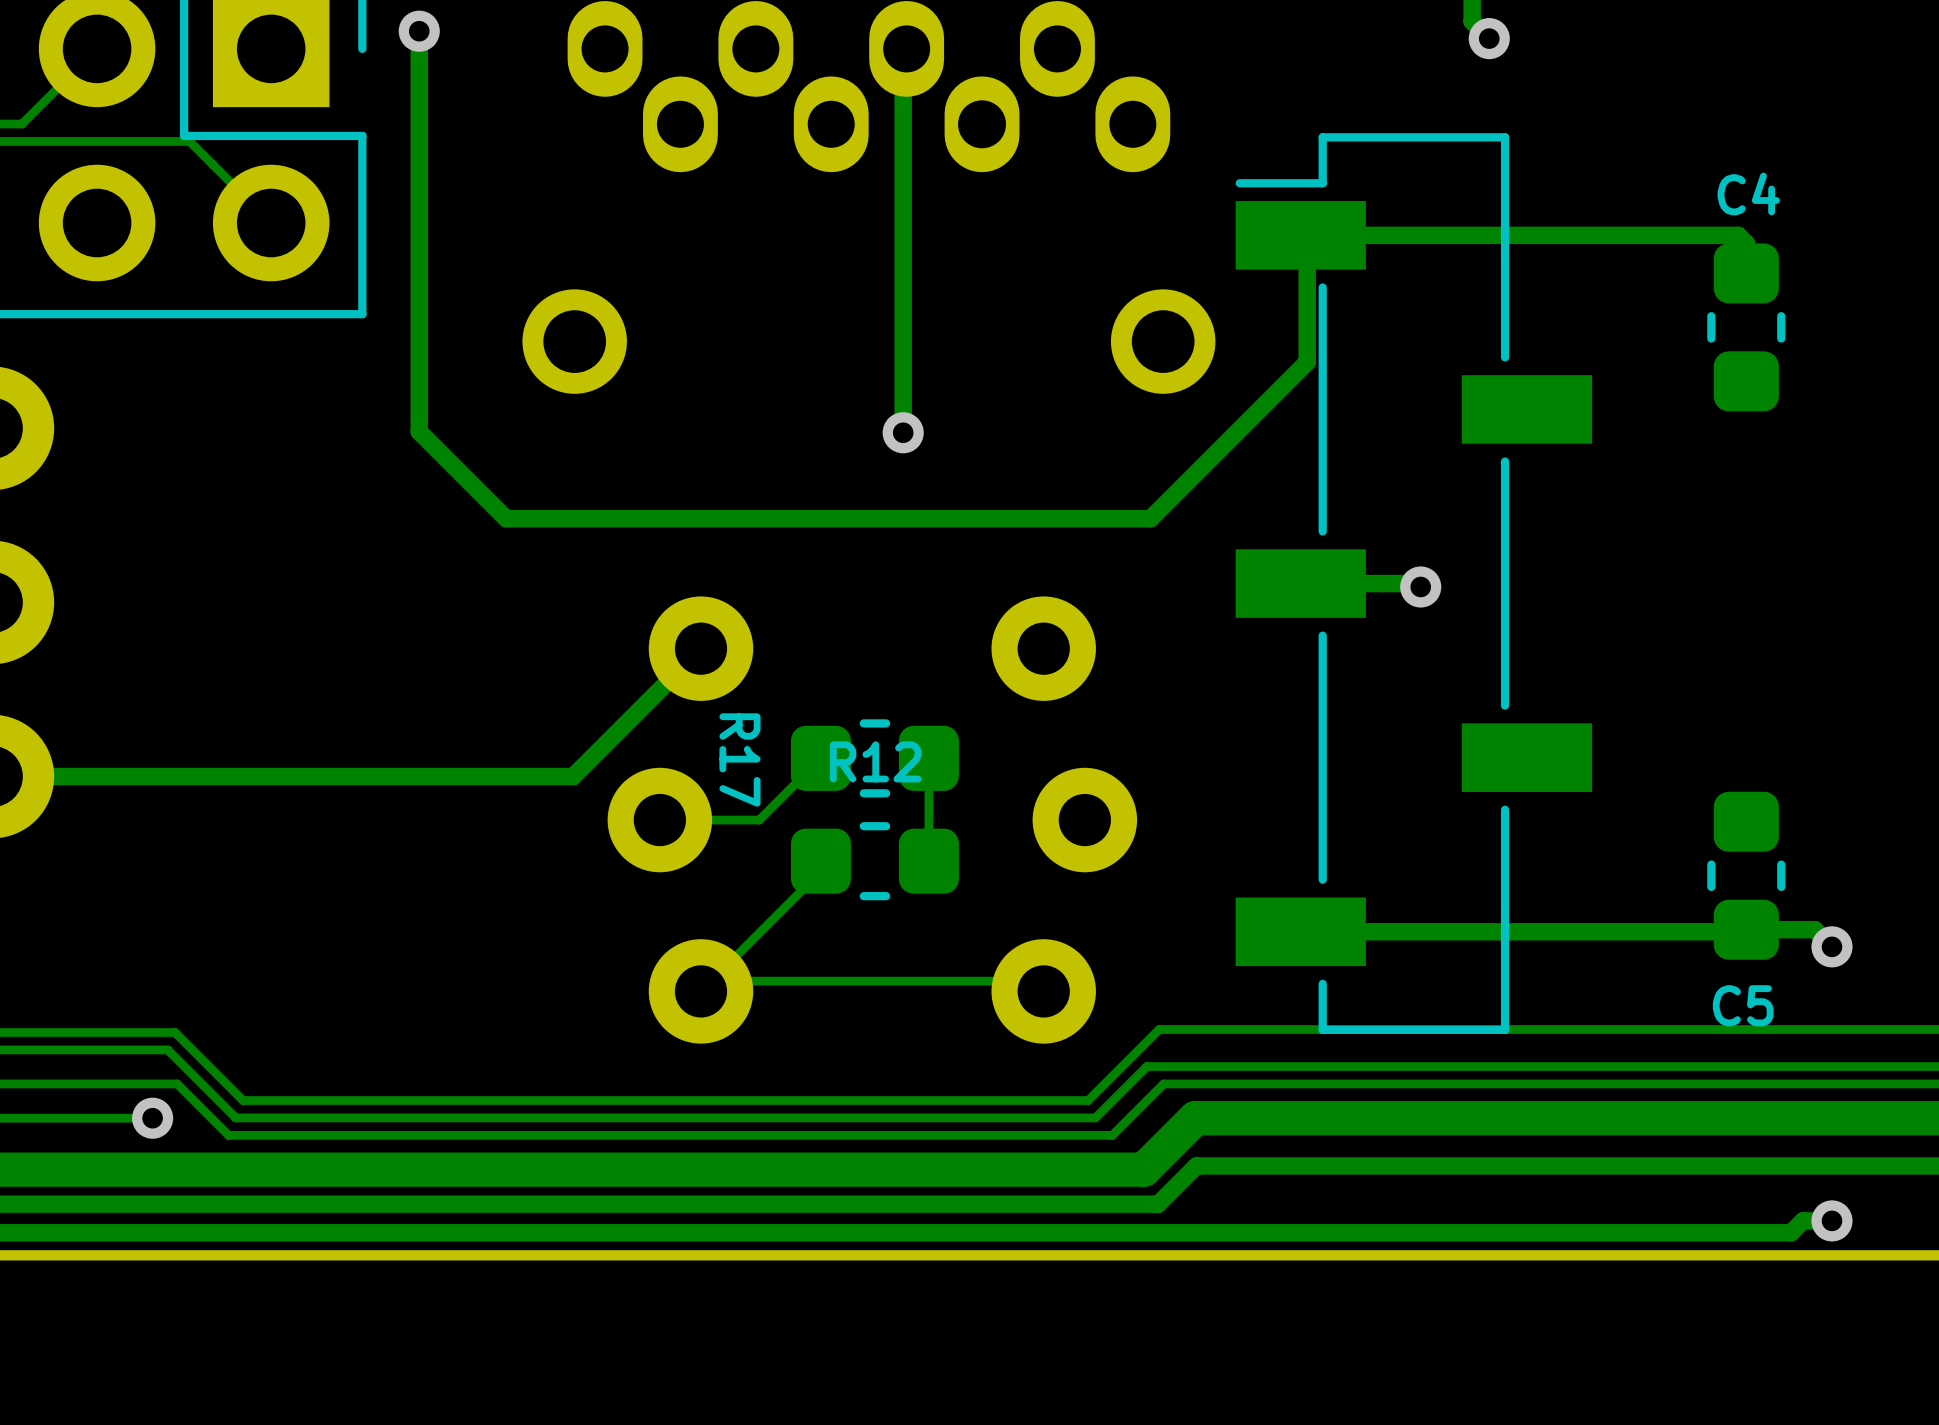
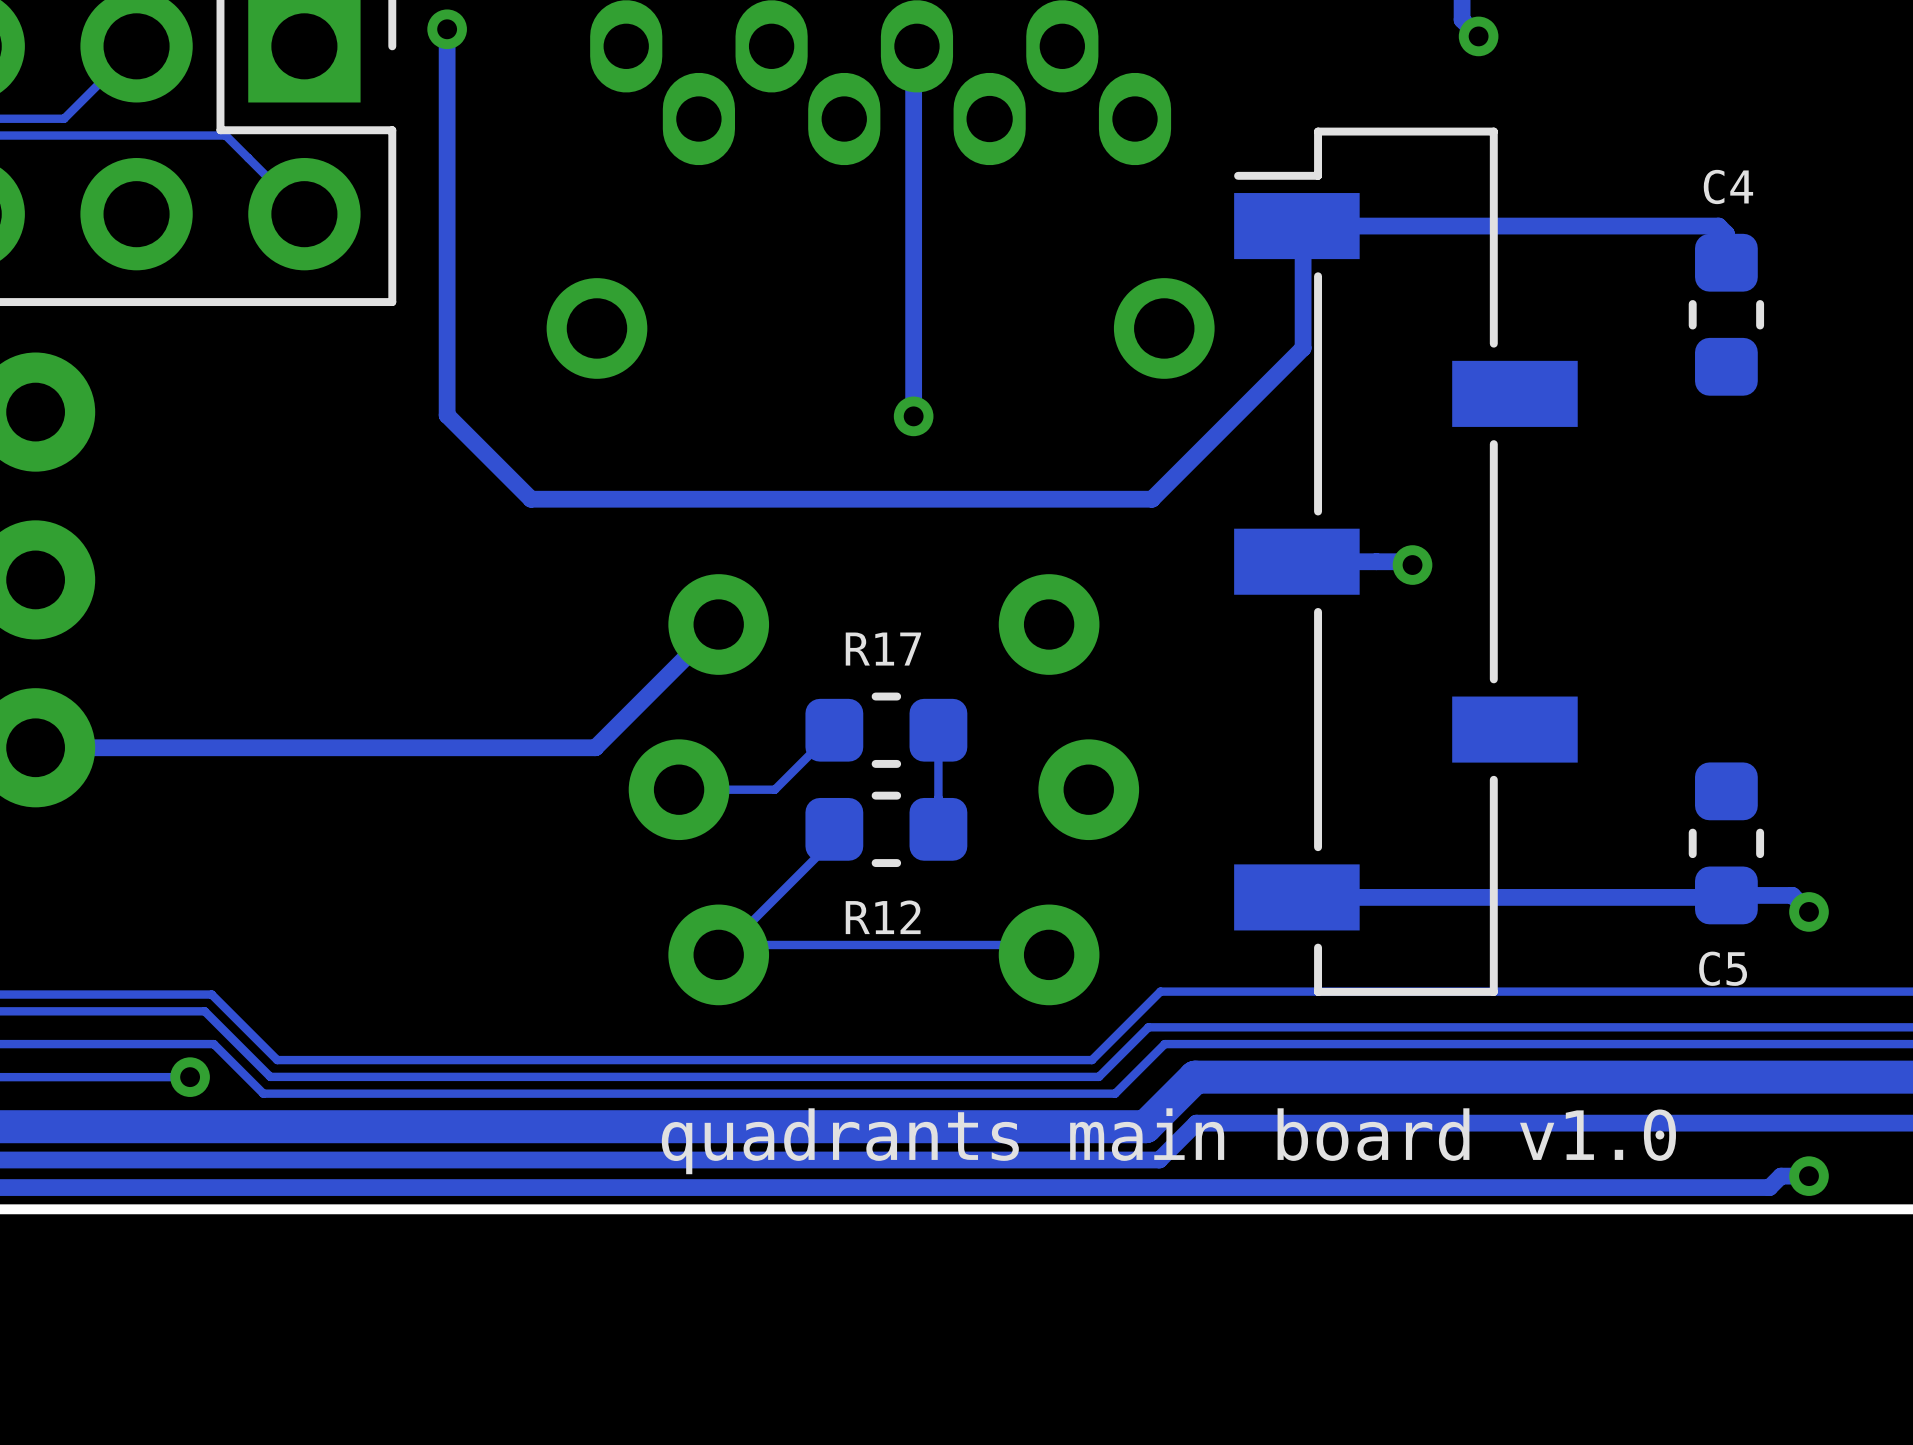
R17 name rotation: 0° (739, 759) -> 90° counterclockwise (883, 649)
R17 name position: R17 (739, 759) -> R17 (883, 649)
R12 name position: R12 (875, 761) -> R12 (883, 917)
text: none -> quadrants main board v1.0 (1168, 1141)

